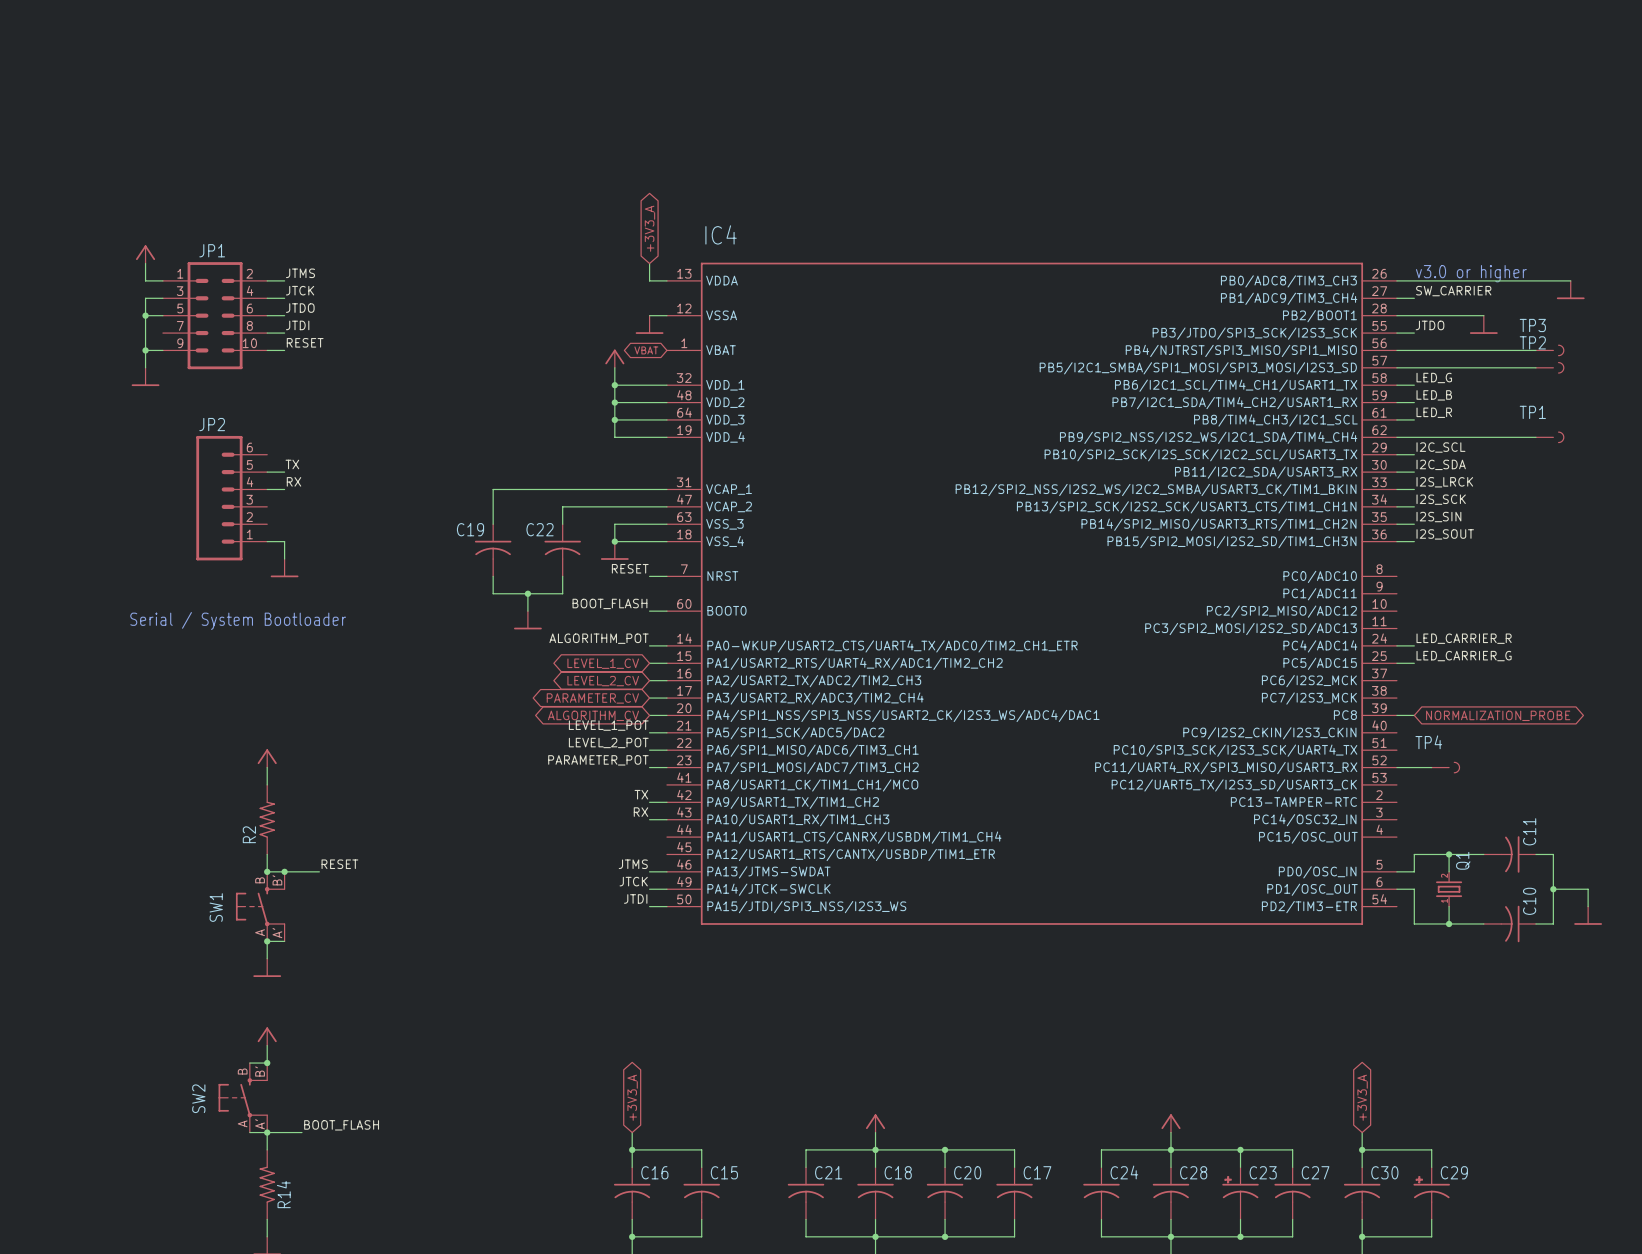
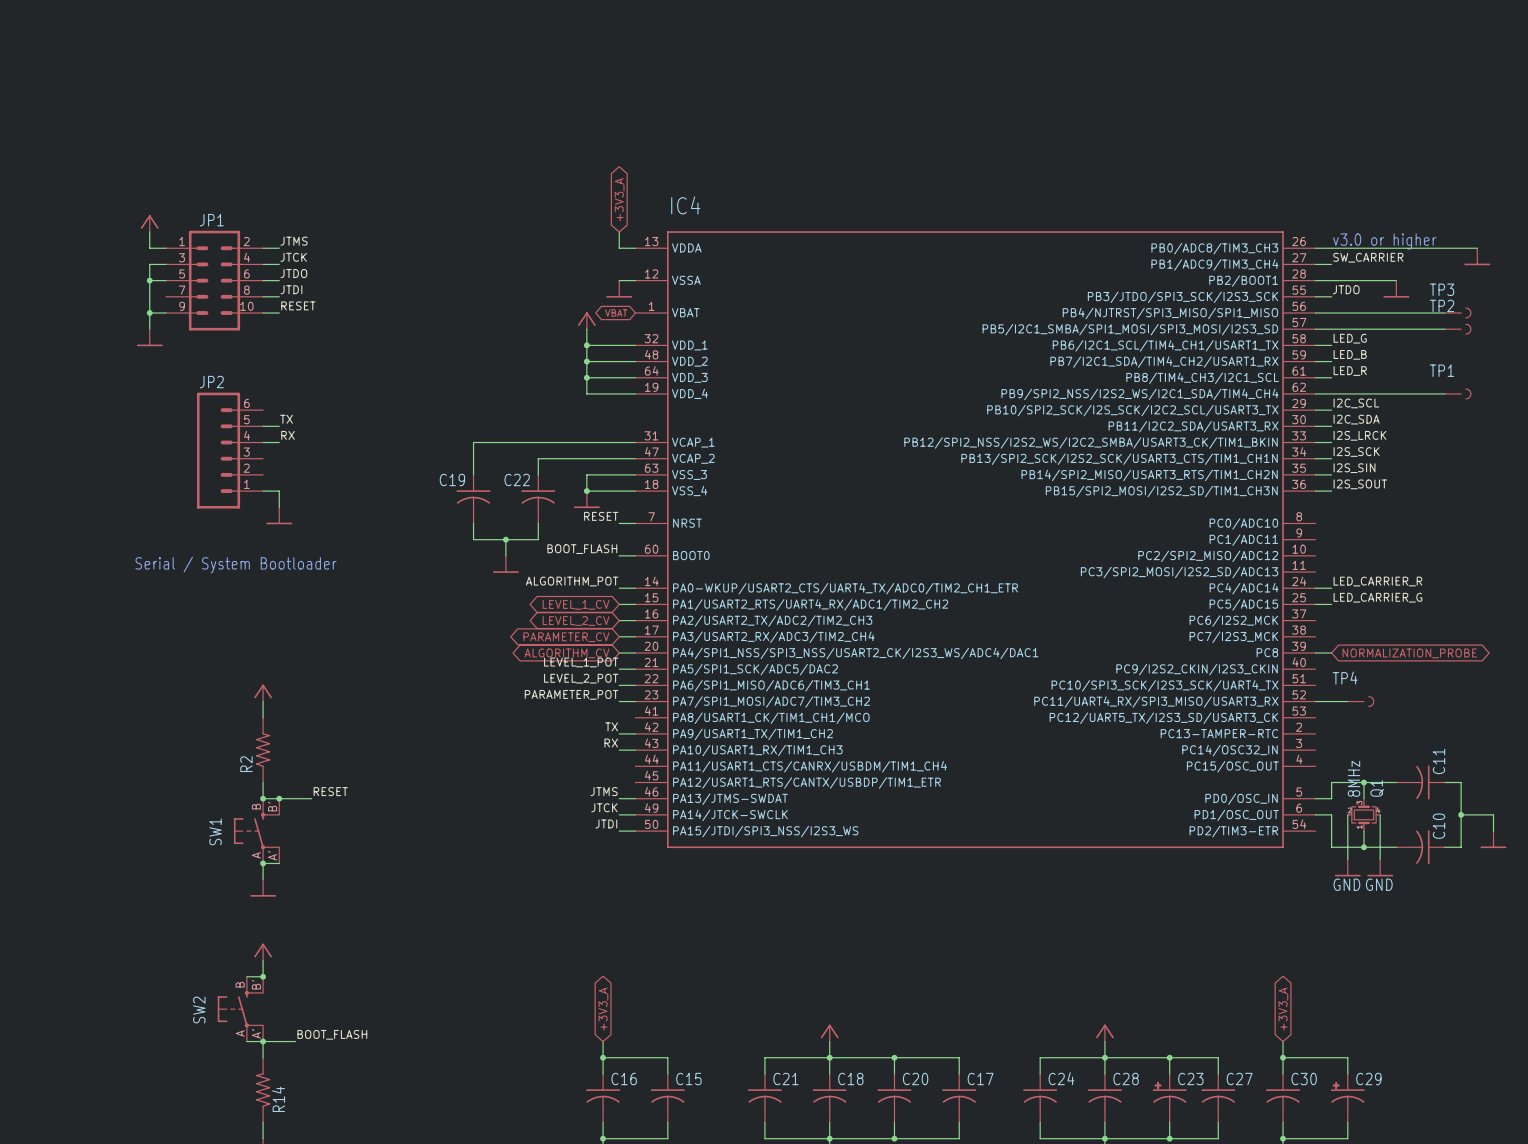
Q1 value: none -> 8MHz (1353, 778)
Q1 symbol: [1436, 871, 1463, 908] -> [1347, 798, 1381, 832]
wire: none -> (1347, 814) (1347, 859)
wire: none -> (1380, 814) (1380, 859)
power symbol: none -> GND (1347, 867)
power symbol: none -> GND (1380, 867)

